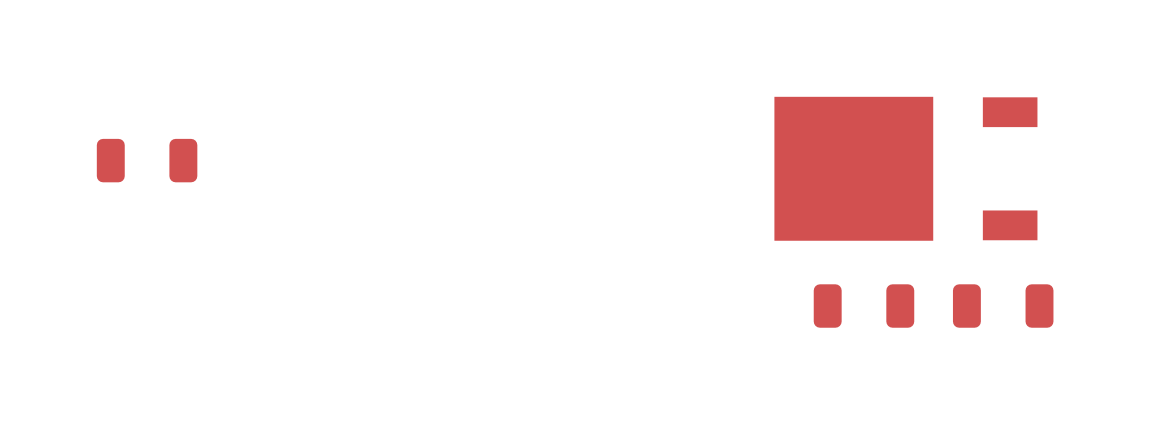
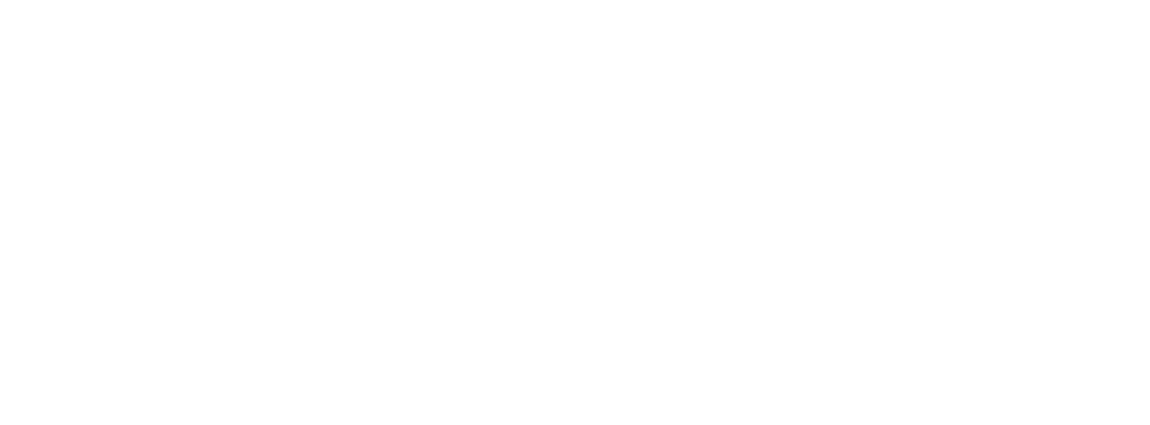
part: (147, 160) -> none
part: (905, 168) -> none
part: (863, 306) -> none
part: (1003, 306) -> none

